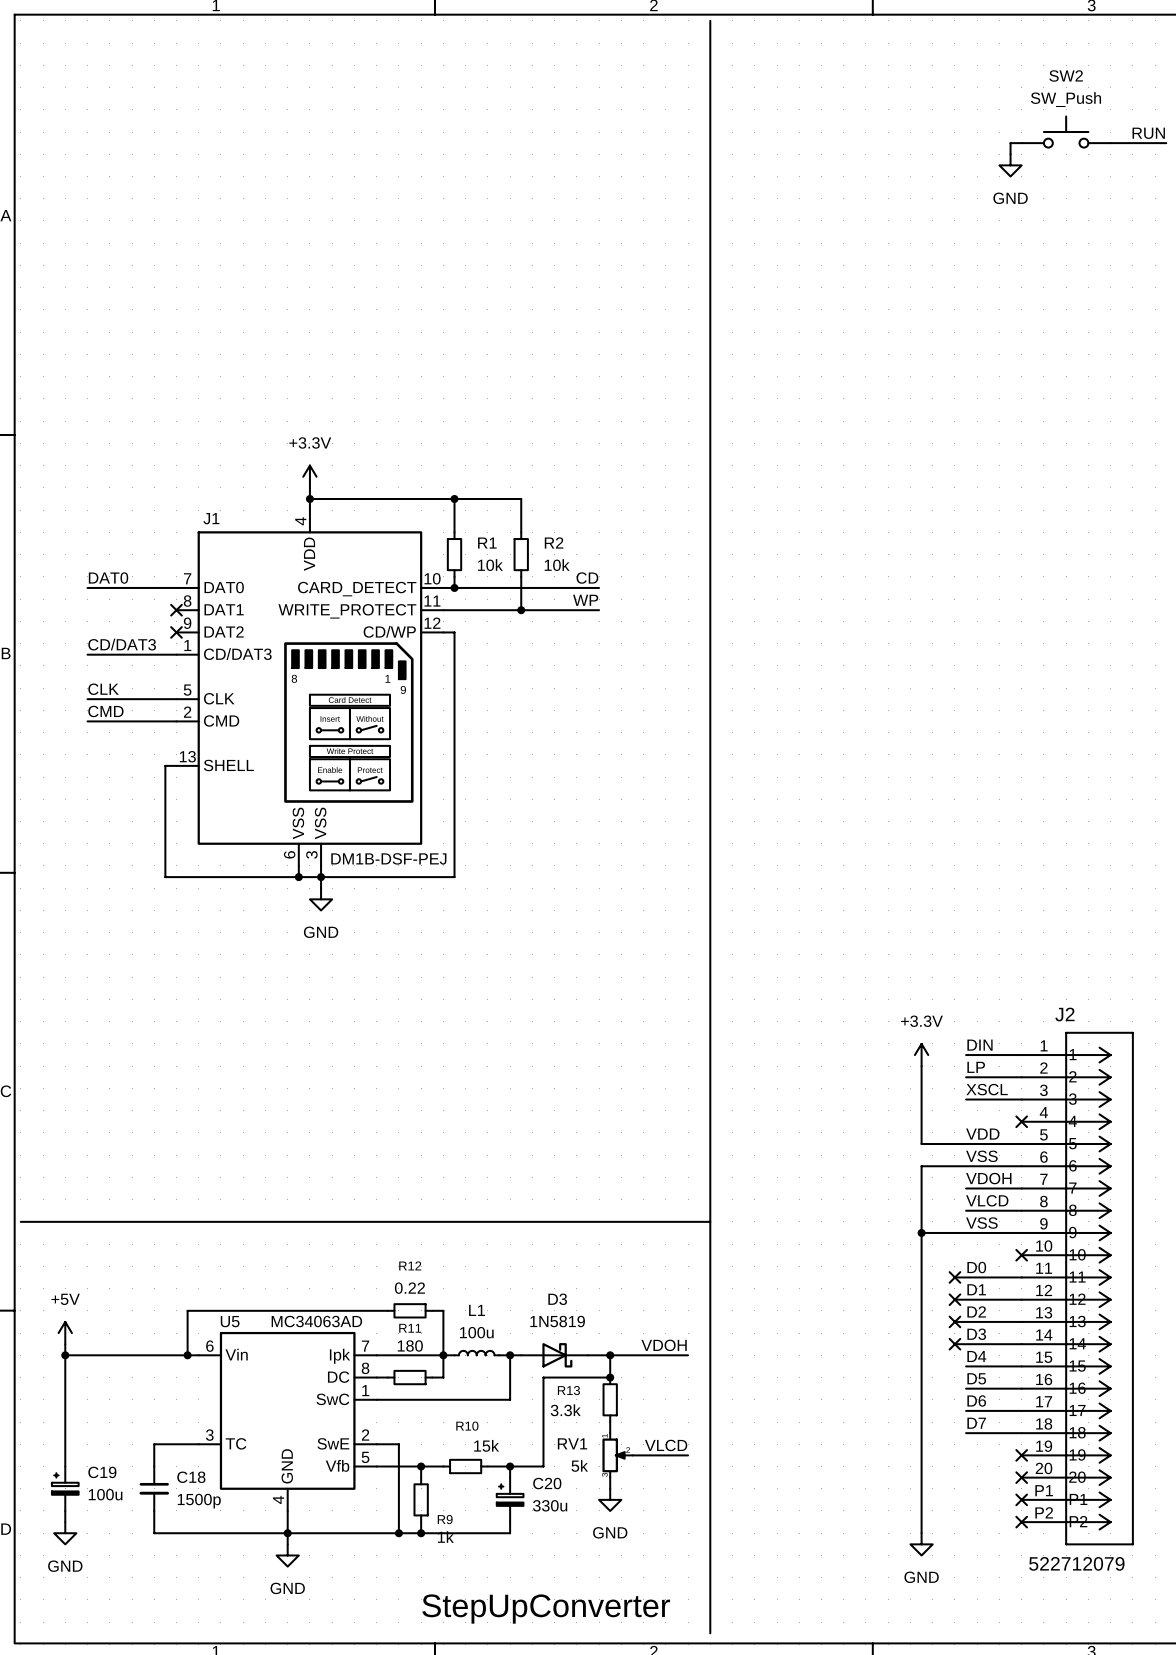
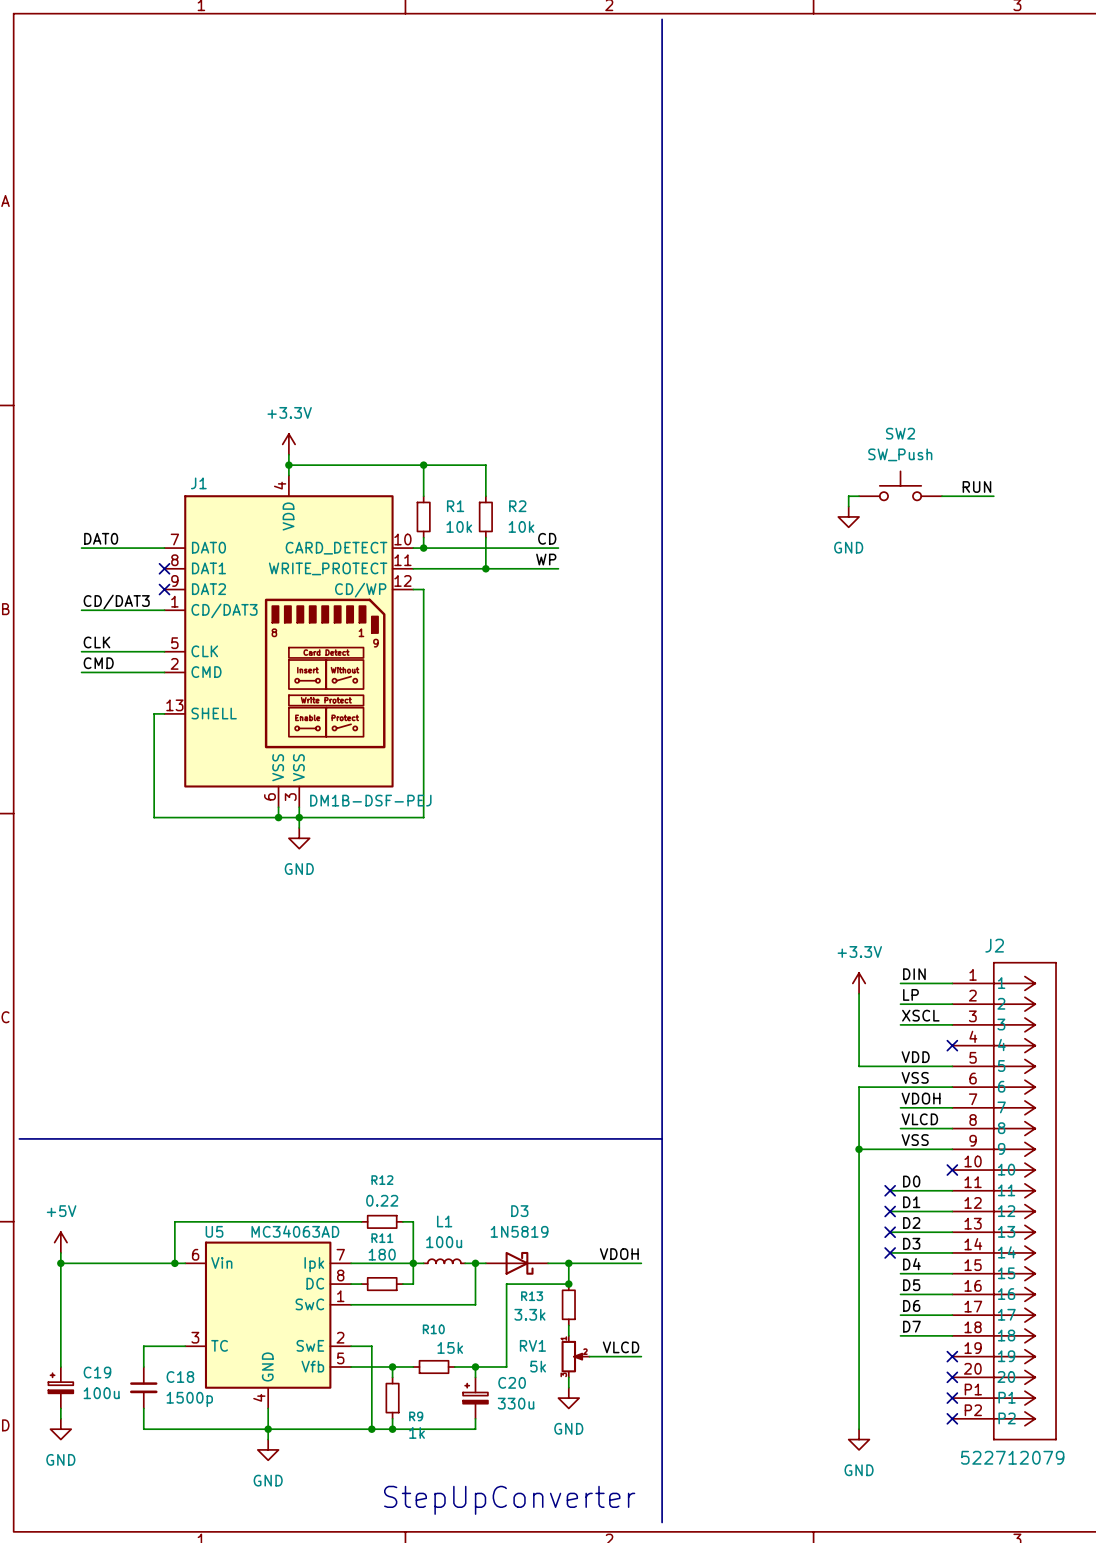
SW2 position: (1066, 132) -> (900, 485)
label: RUN (1148, 133) -> none
wire: (1021, 143) (1010, 143) (1010, 154) -> none
wire: (1110, 143) (1166, 143) -> none
power symbol: GND (1010, 165) -> none
label: none -> RUN (976, 486)
wire: none -> (859, 496) (848, 496) (848, 506)
wire: none -> (941, 496) (993, 496)
power symbol: none -> GND (848, 516)

